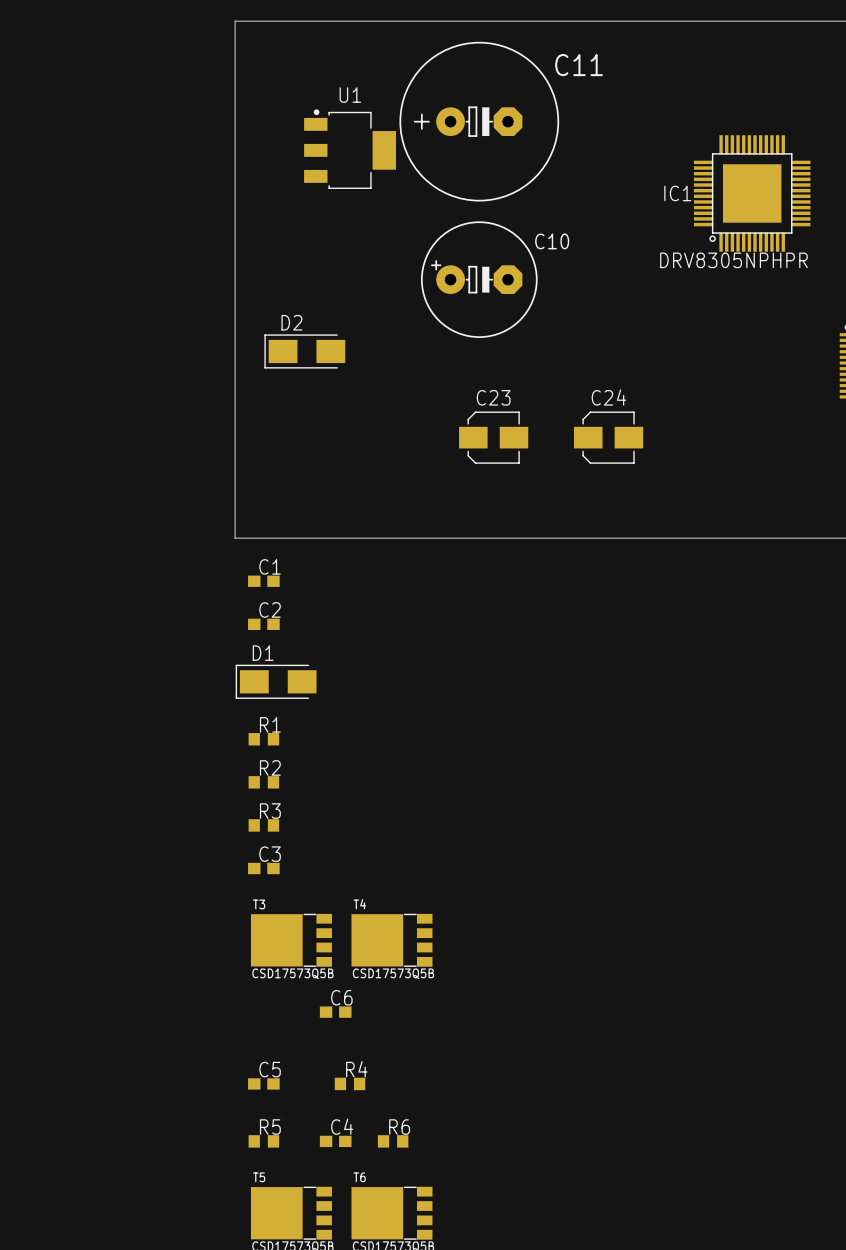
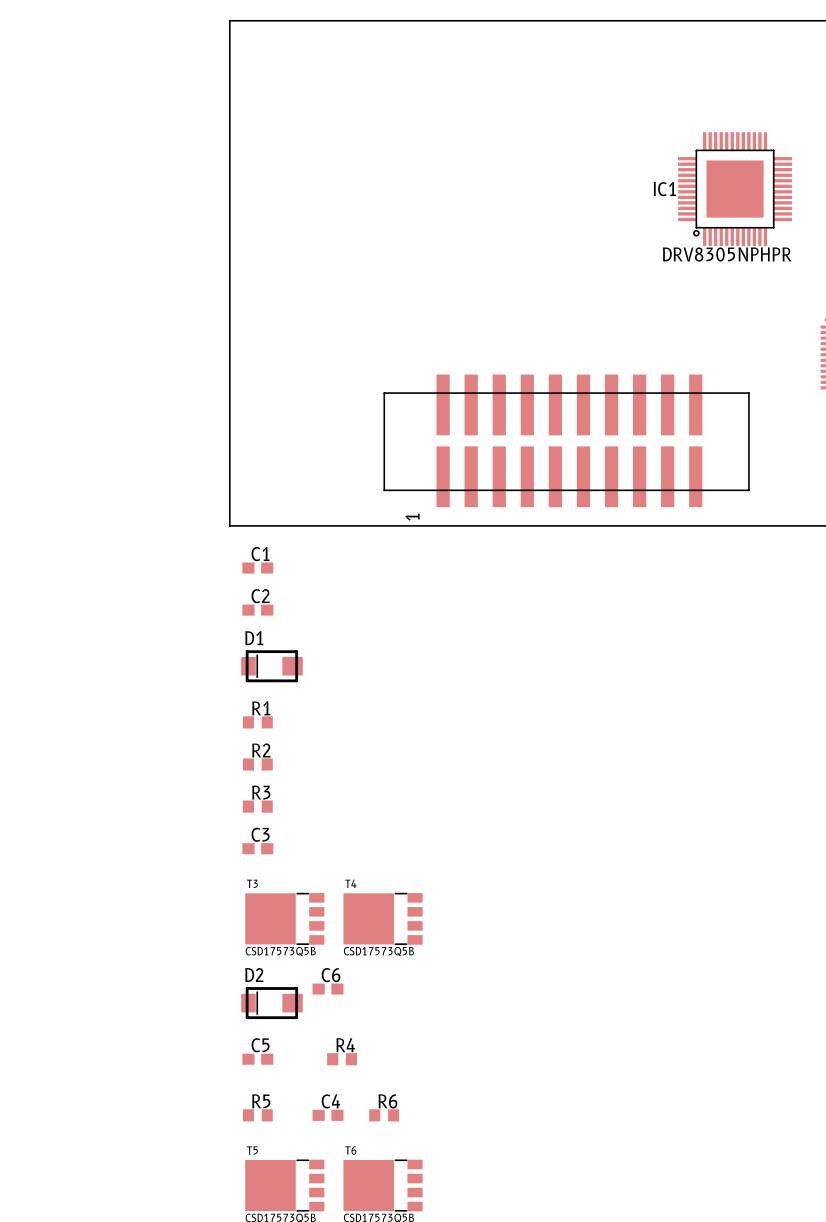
C11: (479, 121) -> none
U1: (350, 149) -> none
C10: (479, 279) -> none
D2 footprint: [264, 334, 346, 369] -> [241, 987, 303, 1020]
C23: (493, 437) -> none
C24: (608, 437) -> none
part: none -> (566, 440)
D1 footprint: [235, 664, 317, 699] -> [241, 650, 303, 683]

